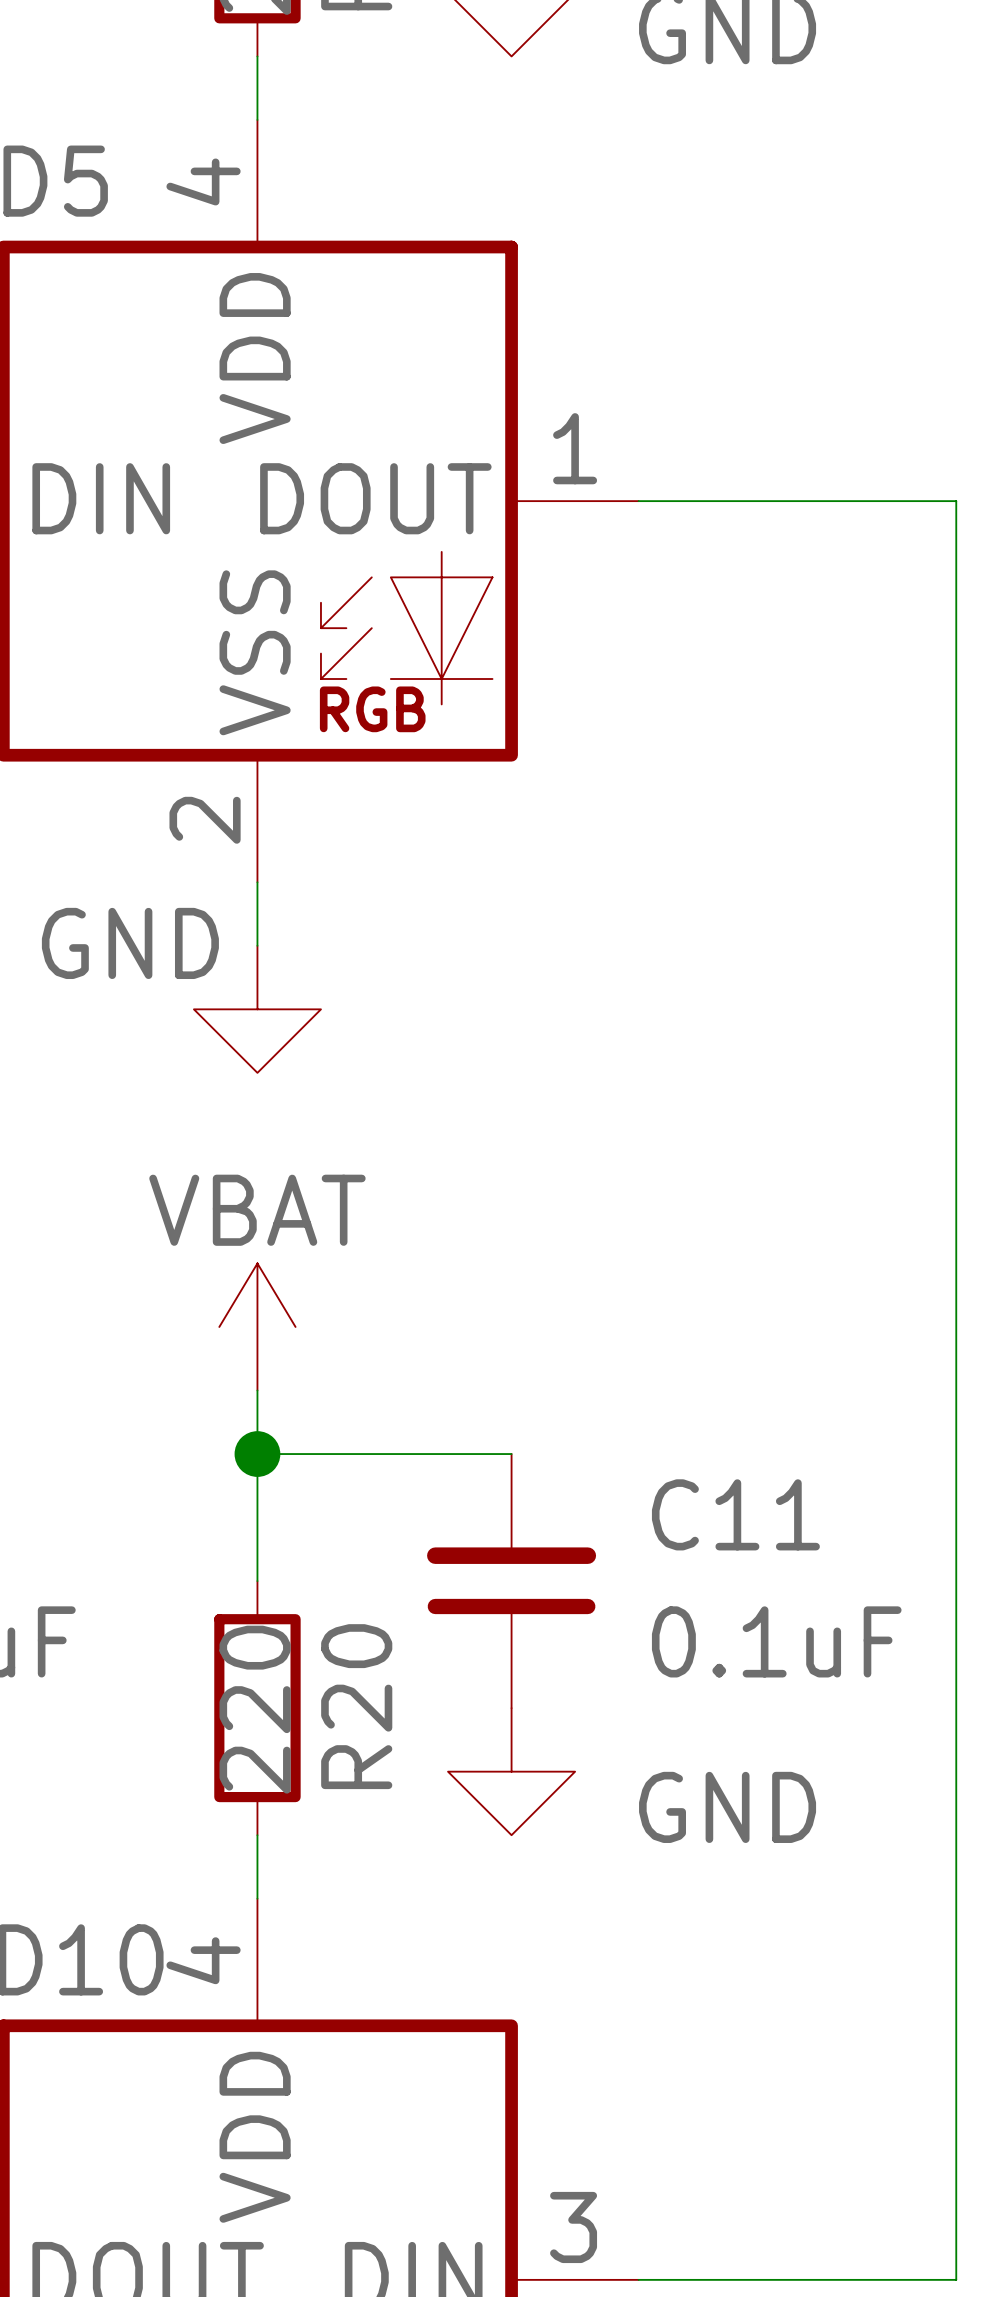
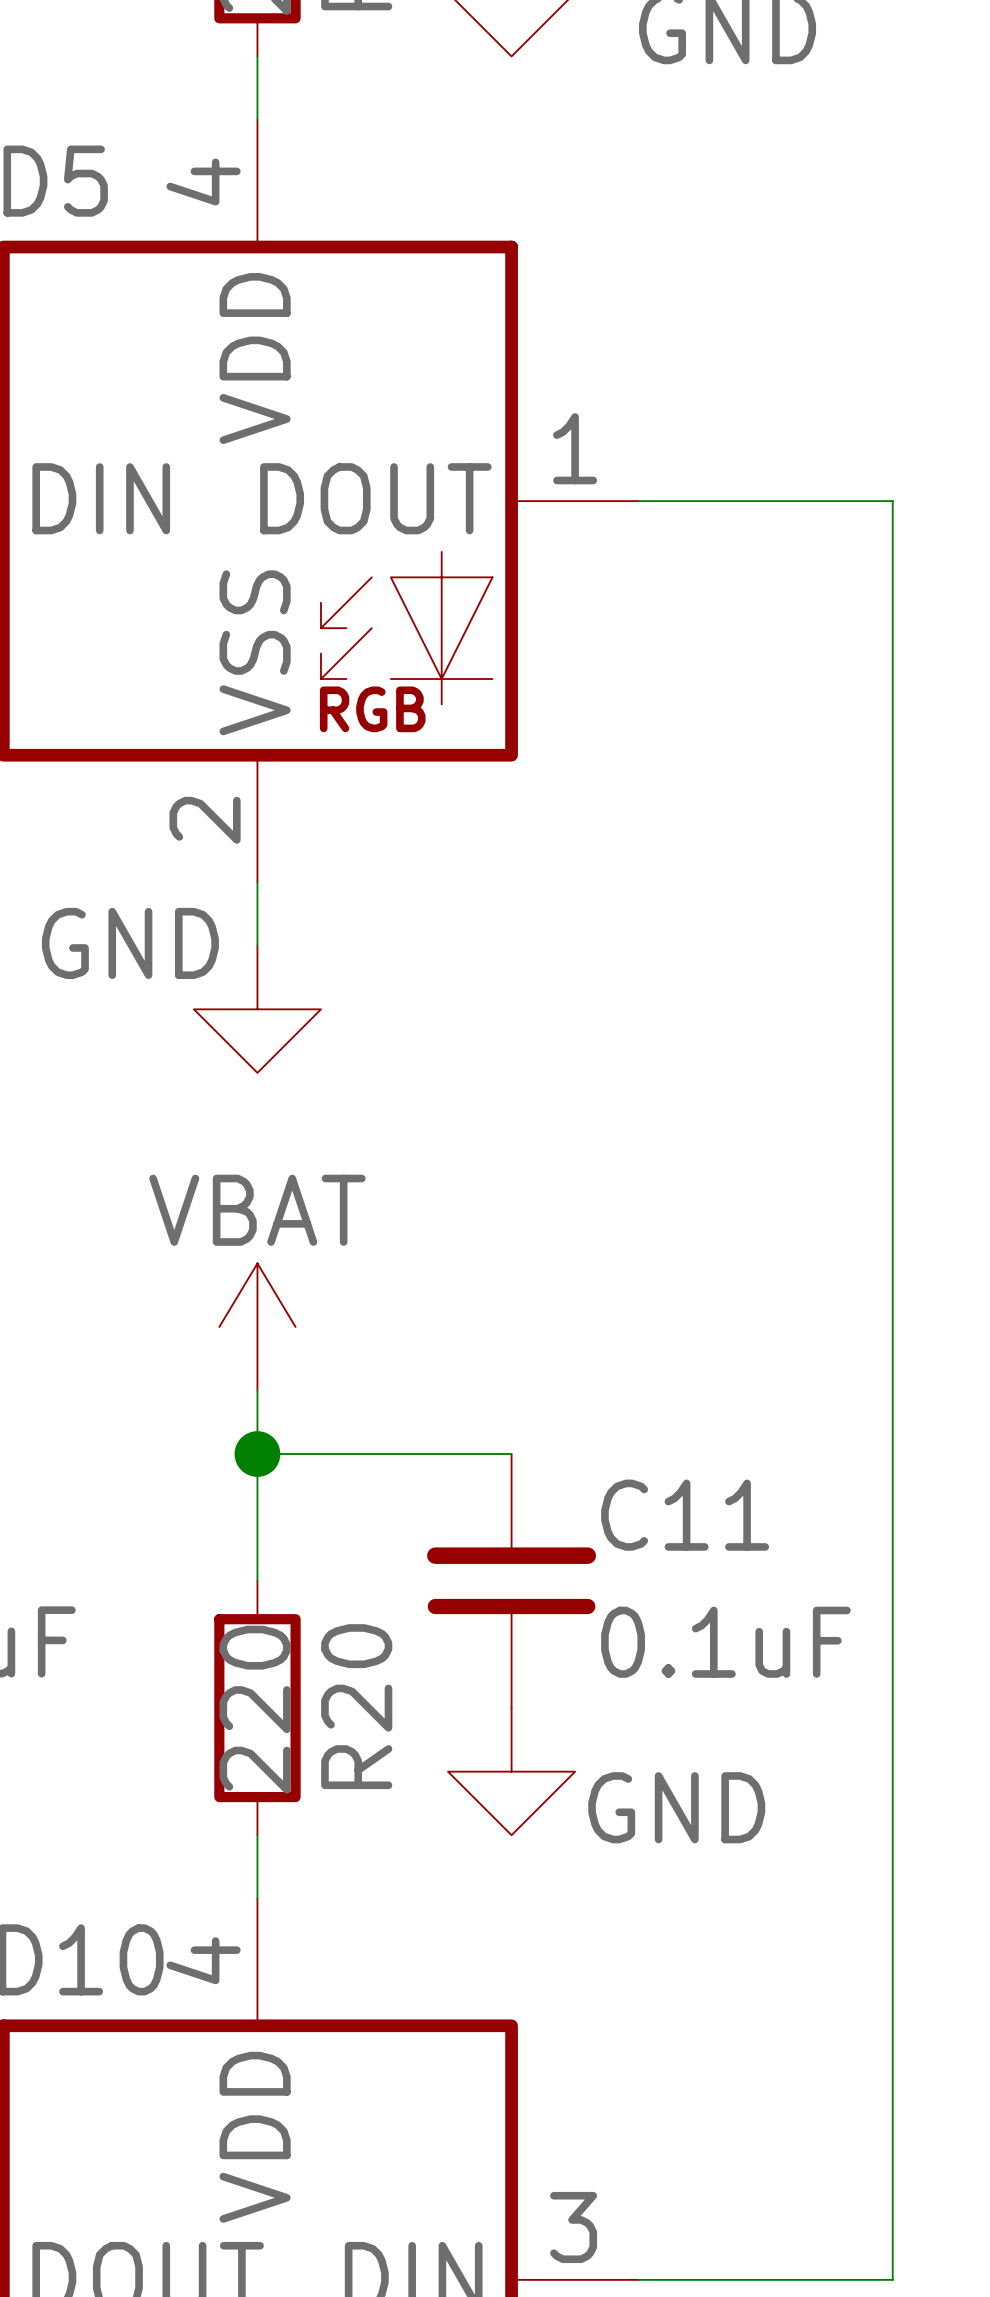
wire: (892, 501) (956, 501) (956, 2279) (892, 2279) -> (892, 501) (892, 2279)
C11 name position: C11 (735, 1514) -> C11 (685, 1515)
C11 value position: 0.1uF (776, 1641) -> 0.1uF (725, 1642)
power symbol text position: GND (727, 1807) -> GND (676, 1807)

